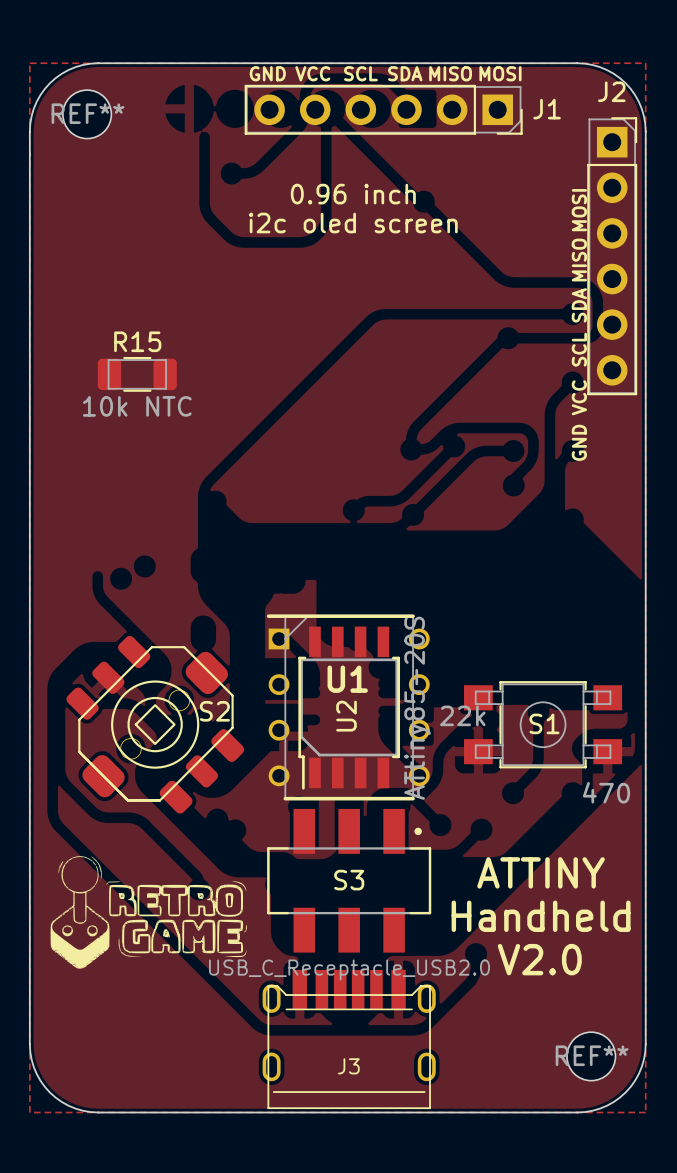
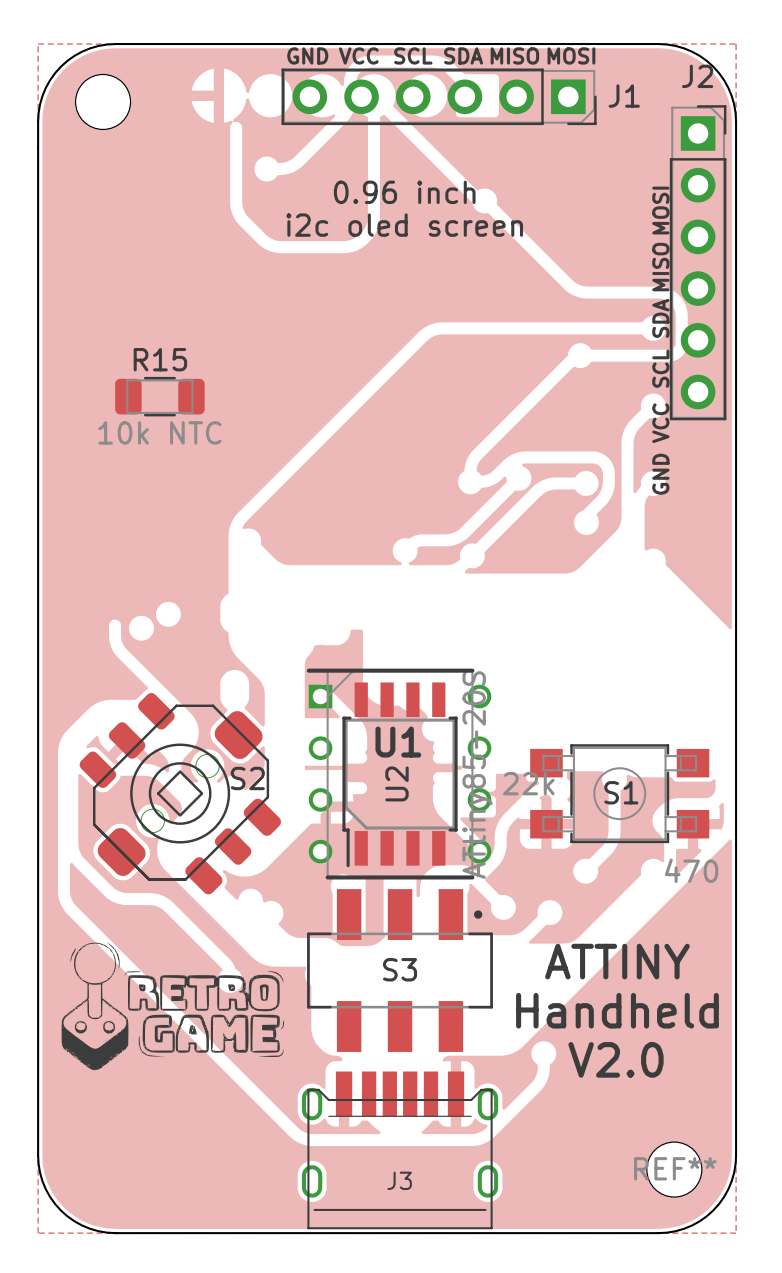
REF** name: REF** (87, 113) -> none
J3 value: USB_C_Receptacle_USB2.0 (349, 969) -> none

